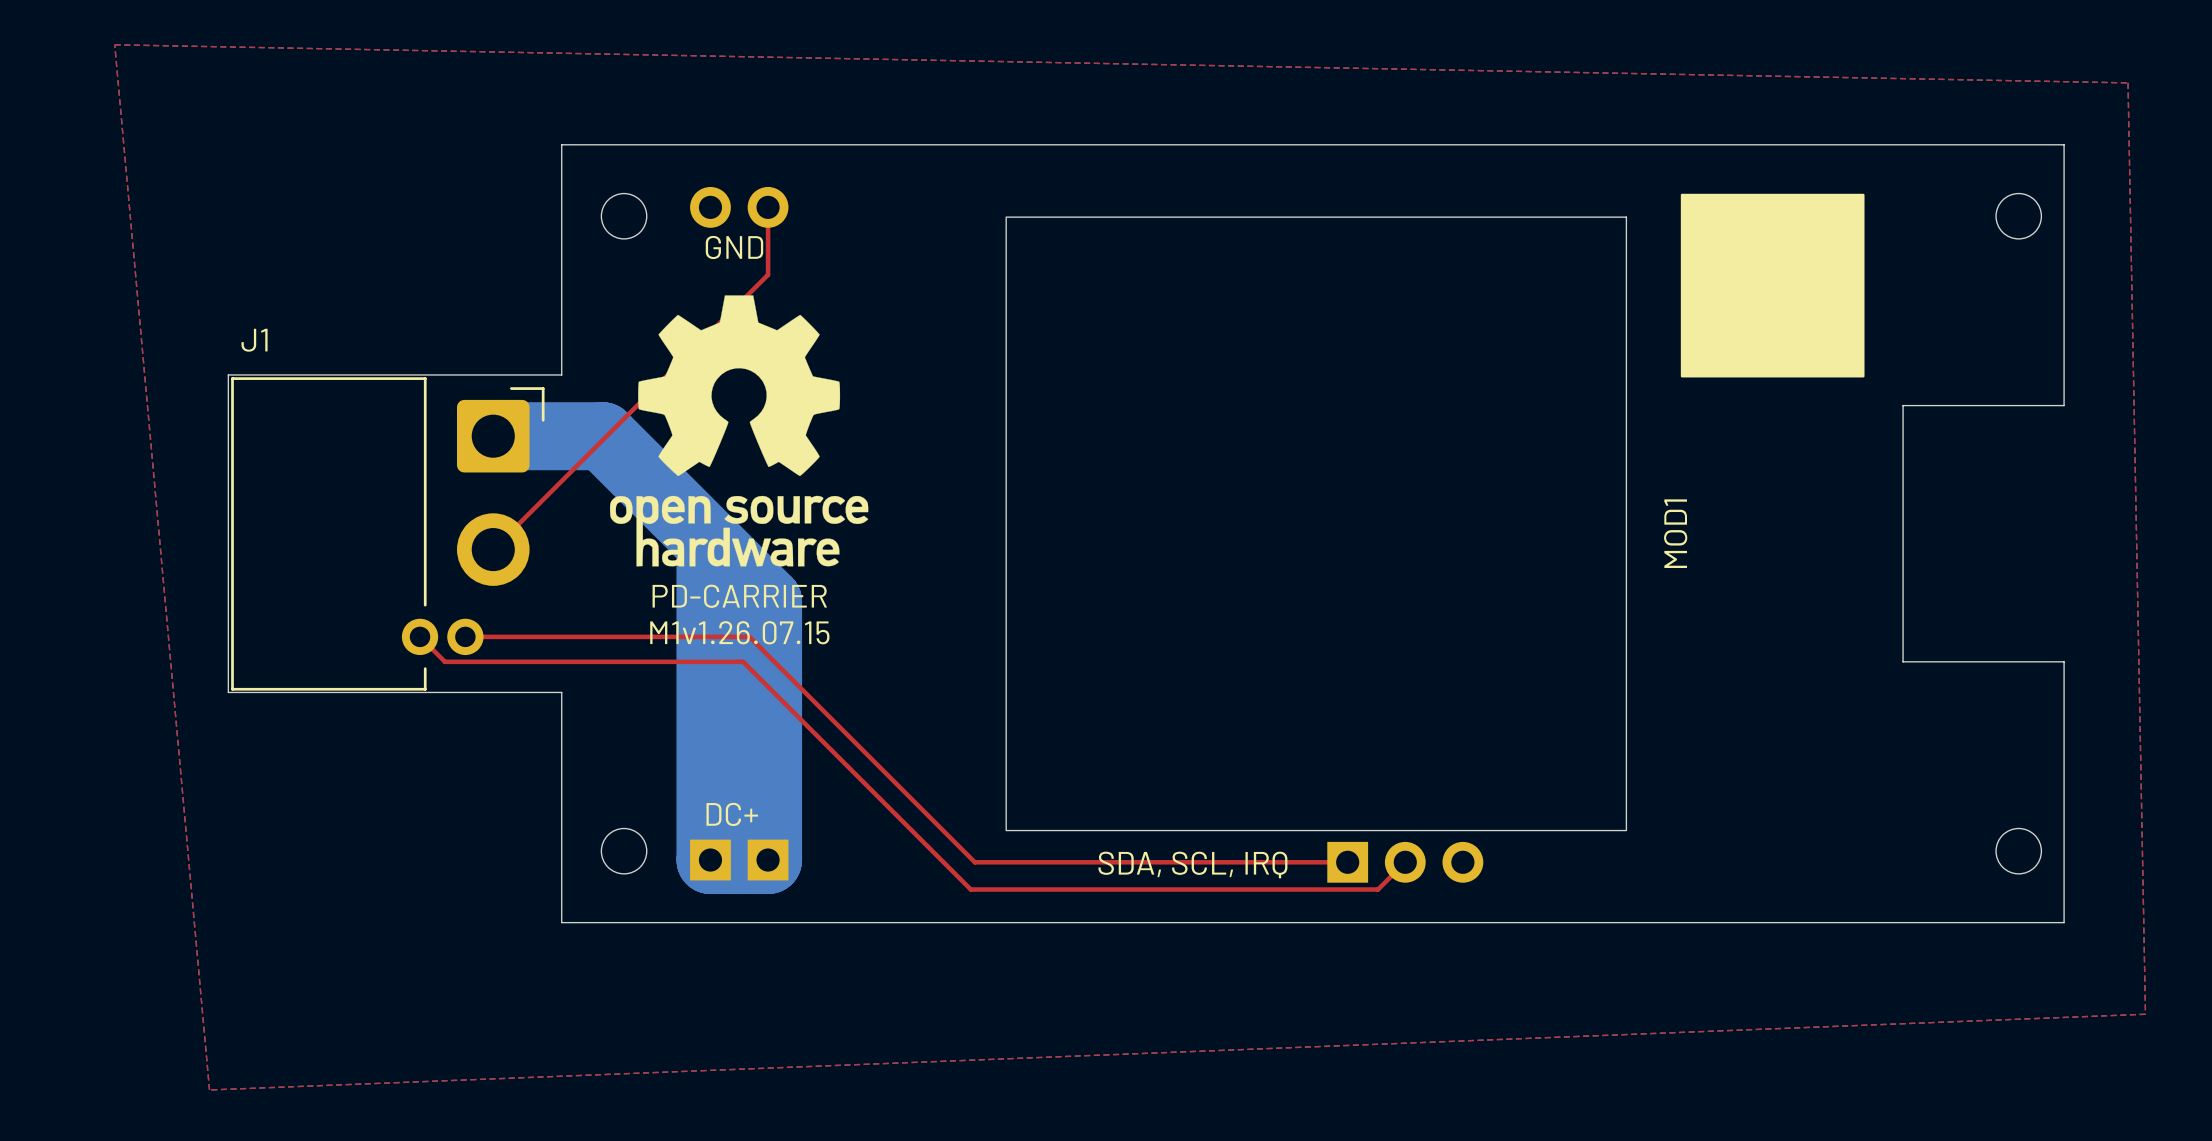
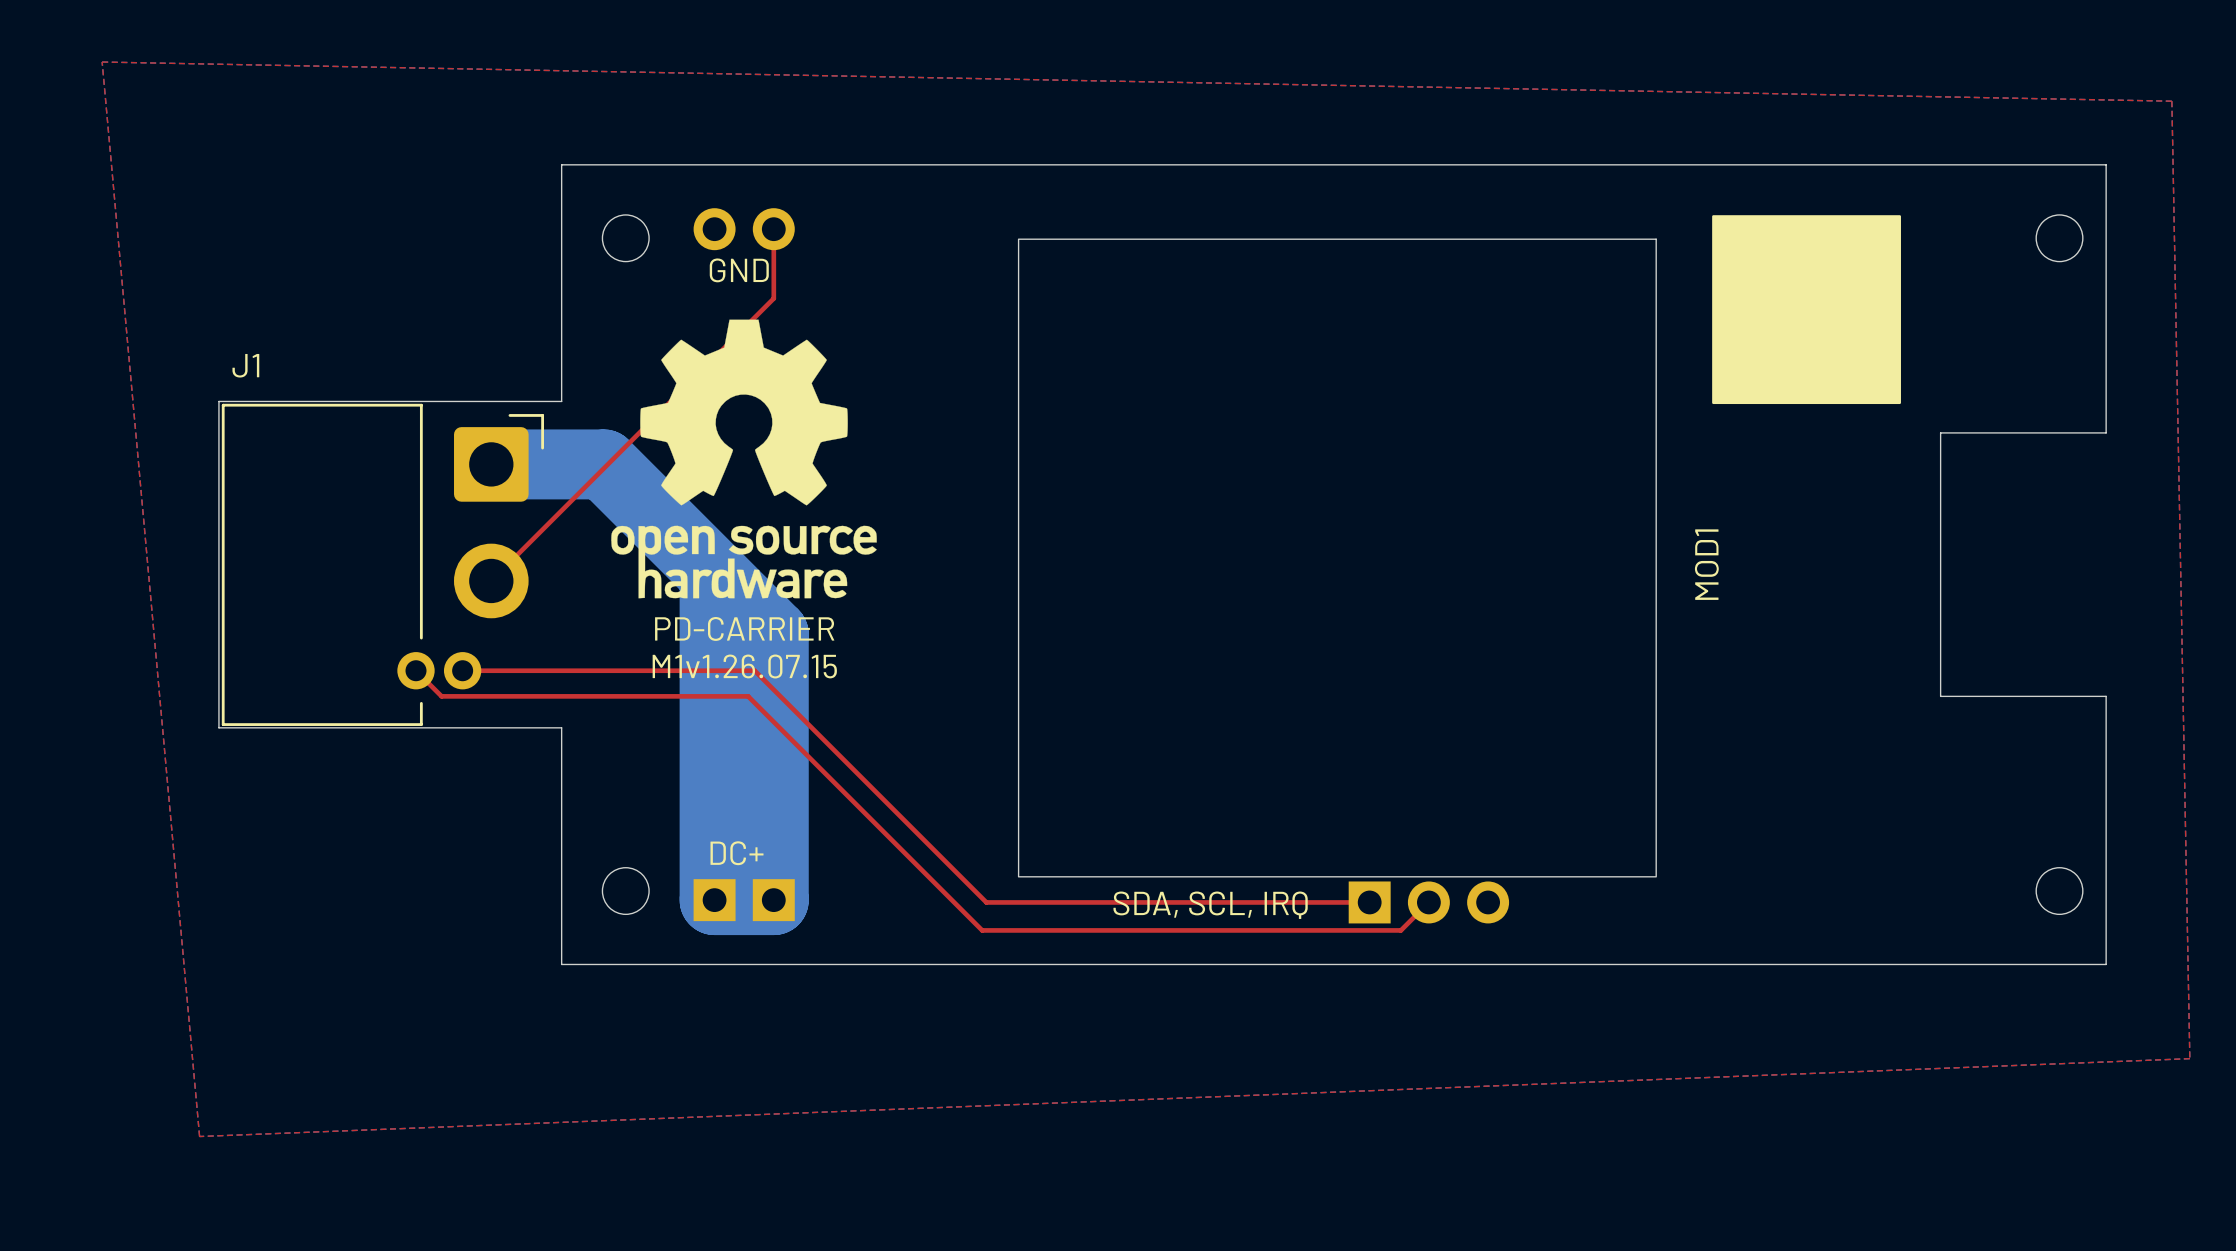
MOD1 footprint: [601, 186, 2065, 883] -> [602, 208, 2107, 924]

